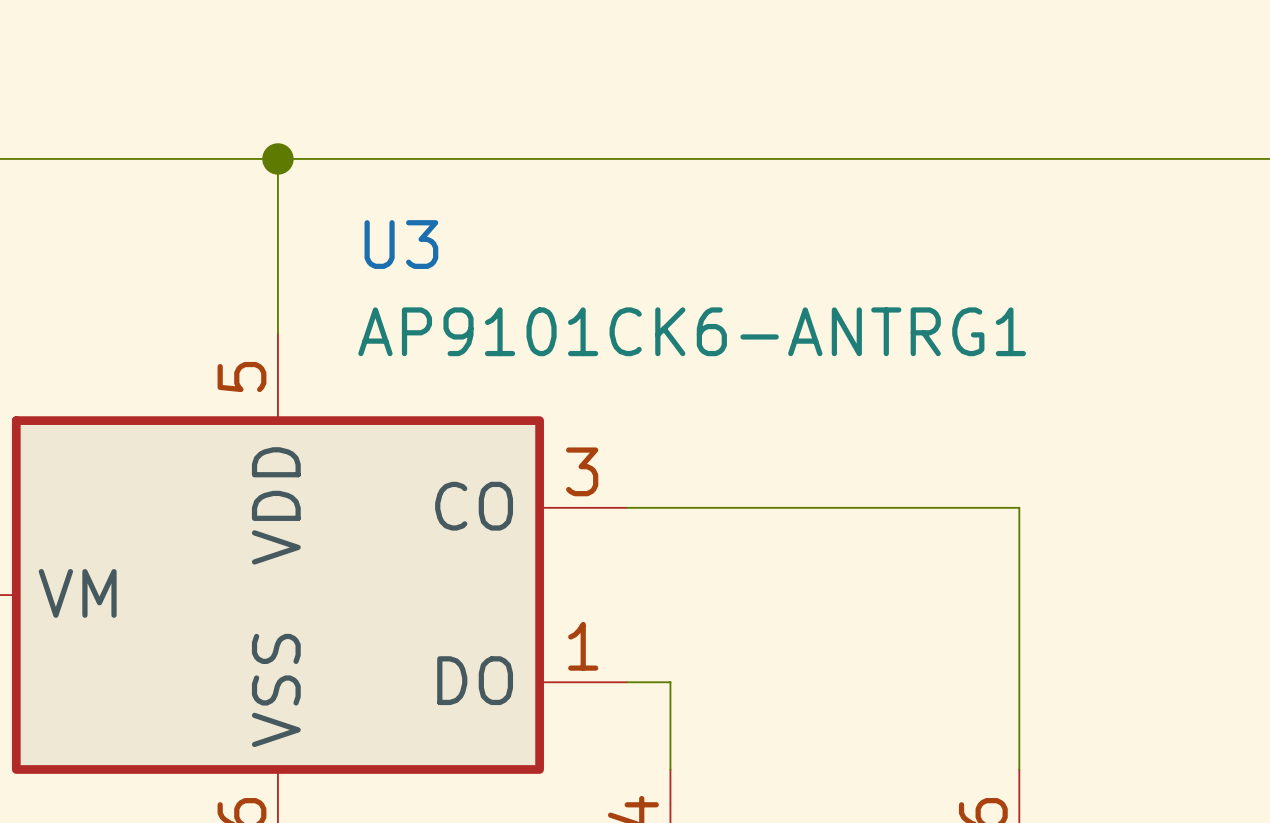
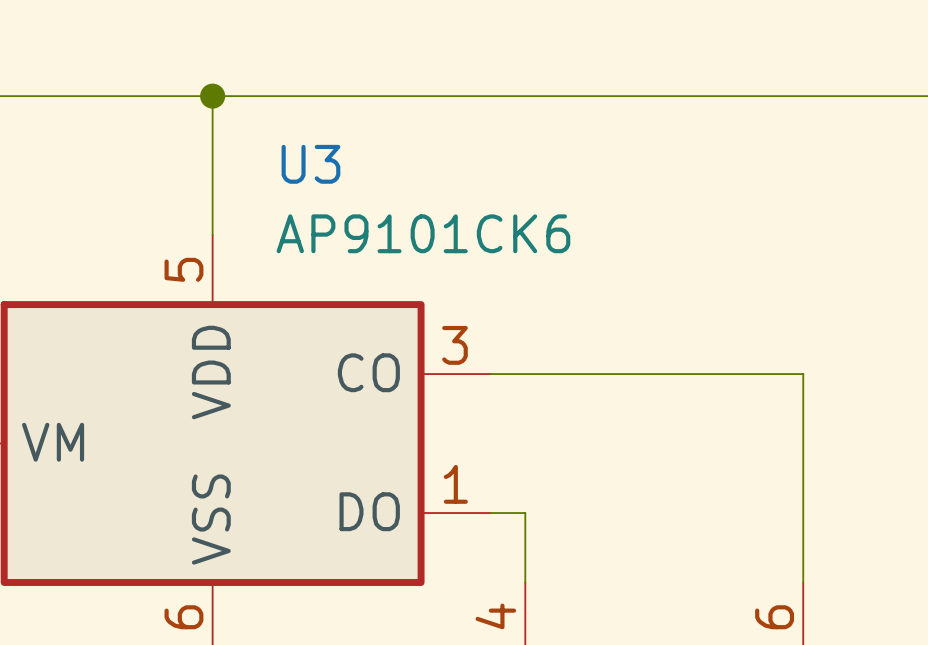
U3 value: AP9101CK6-ANTRG1 (692, 331) -> AP9101CK6 (423, 233)

